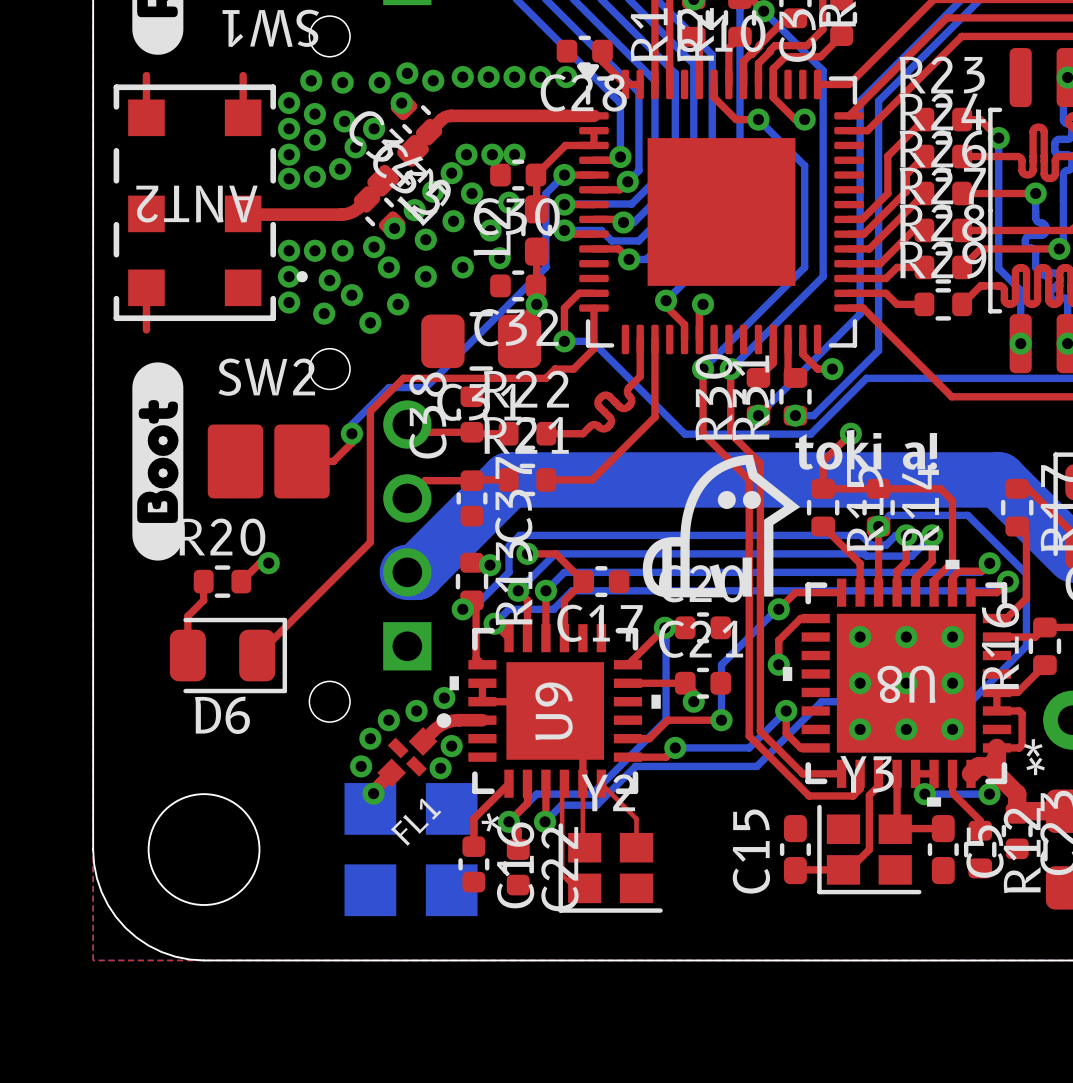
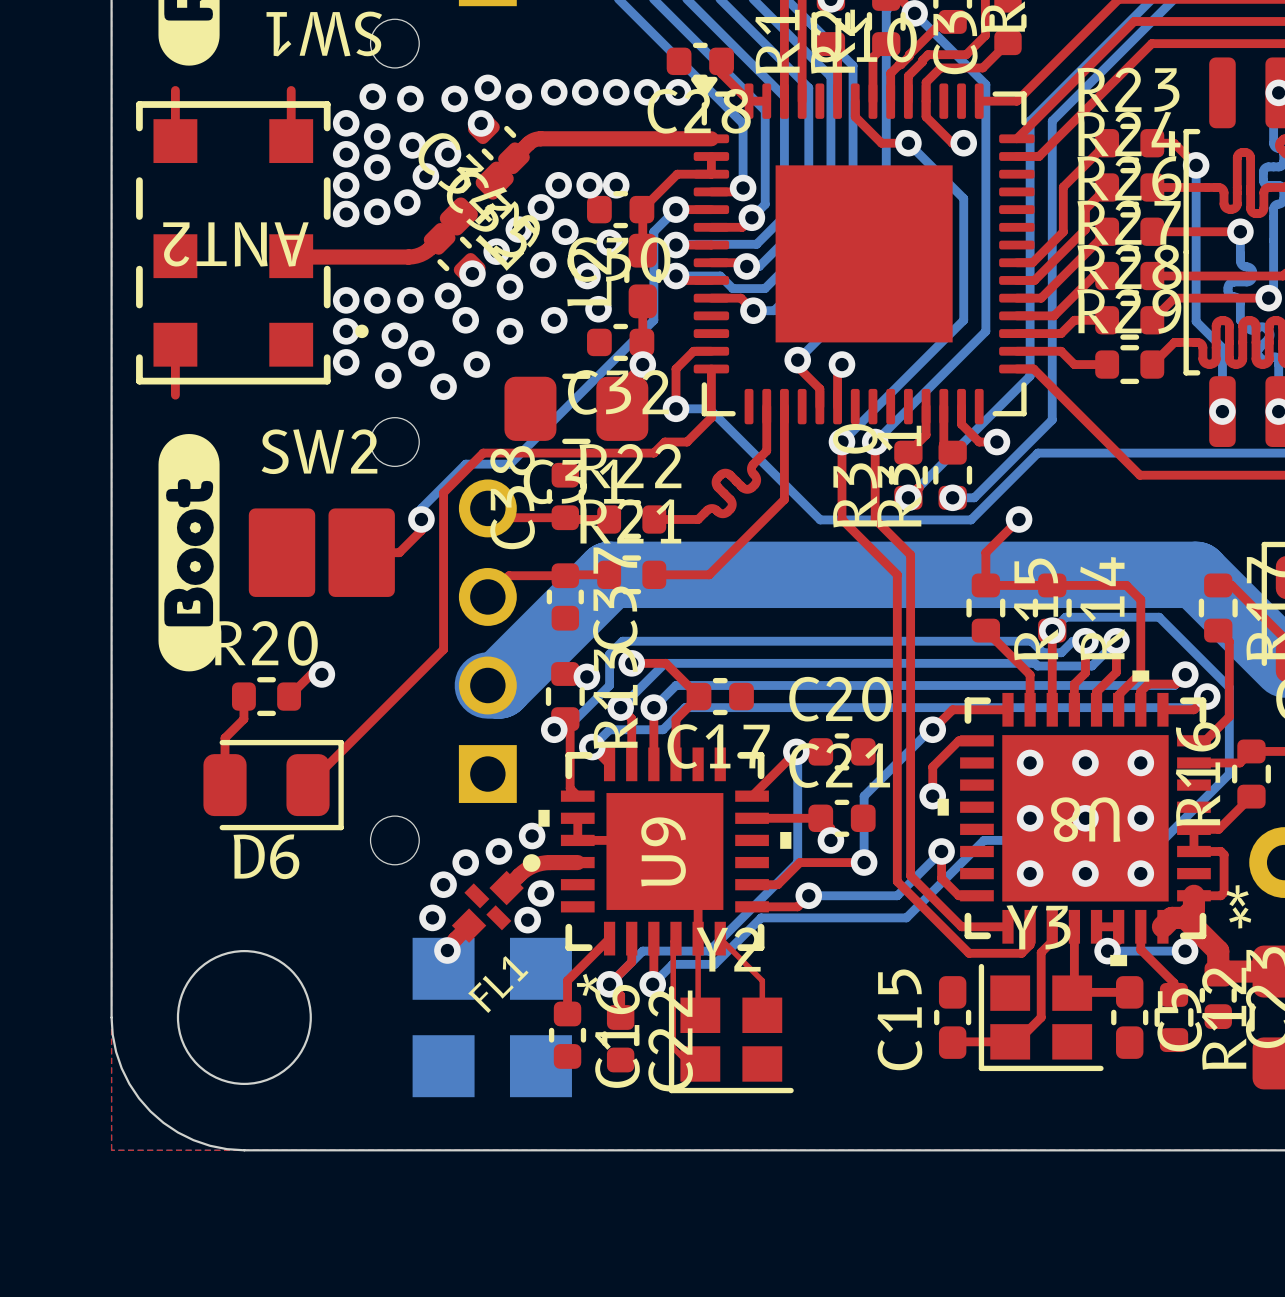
text: toki a! (866, 449) -> none
drawing: [642, 454, 801, 598] -> none

